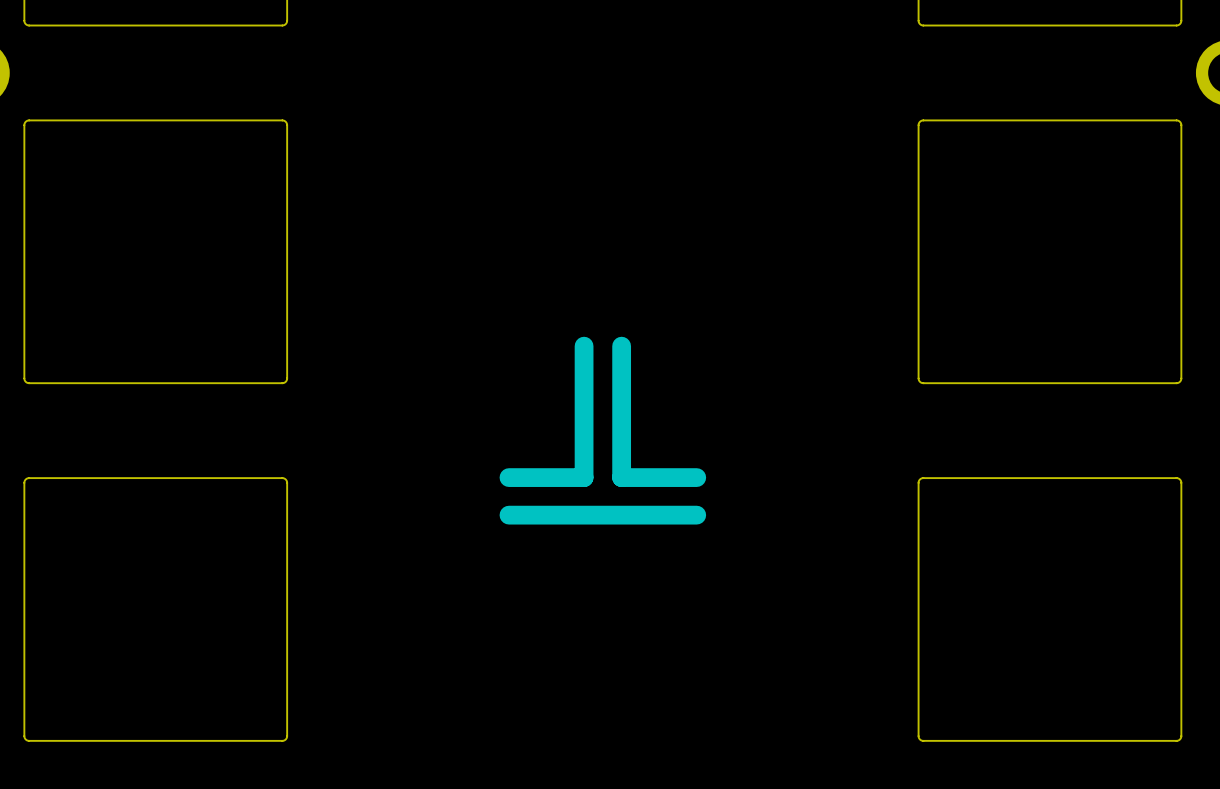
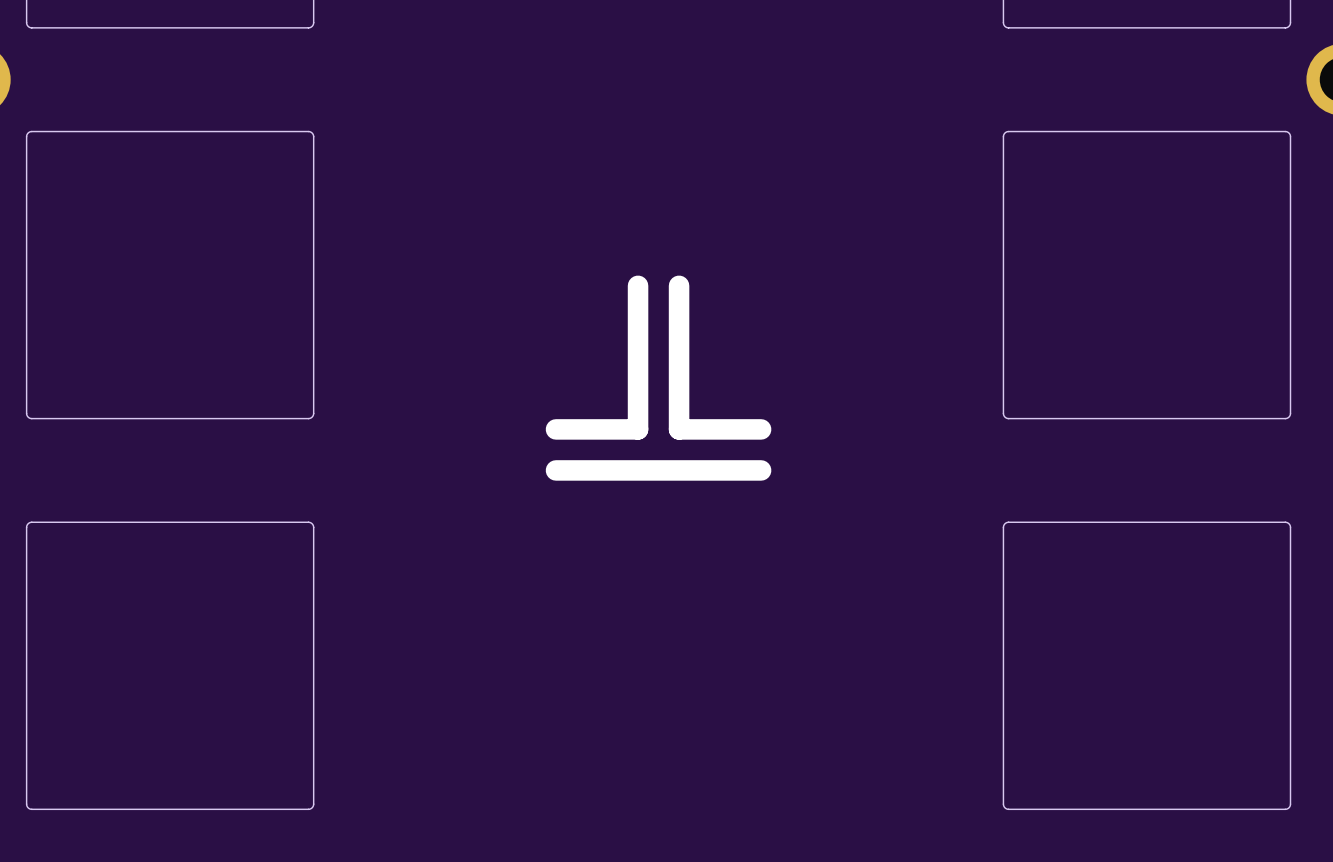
drawing position: (602, 430) -> (658, 378)

